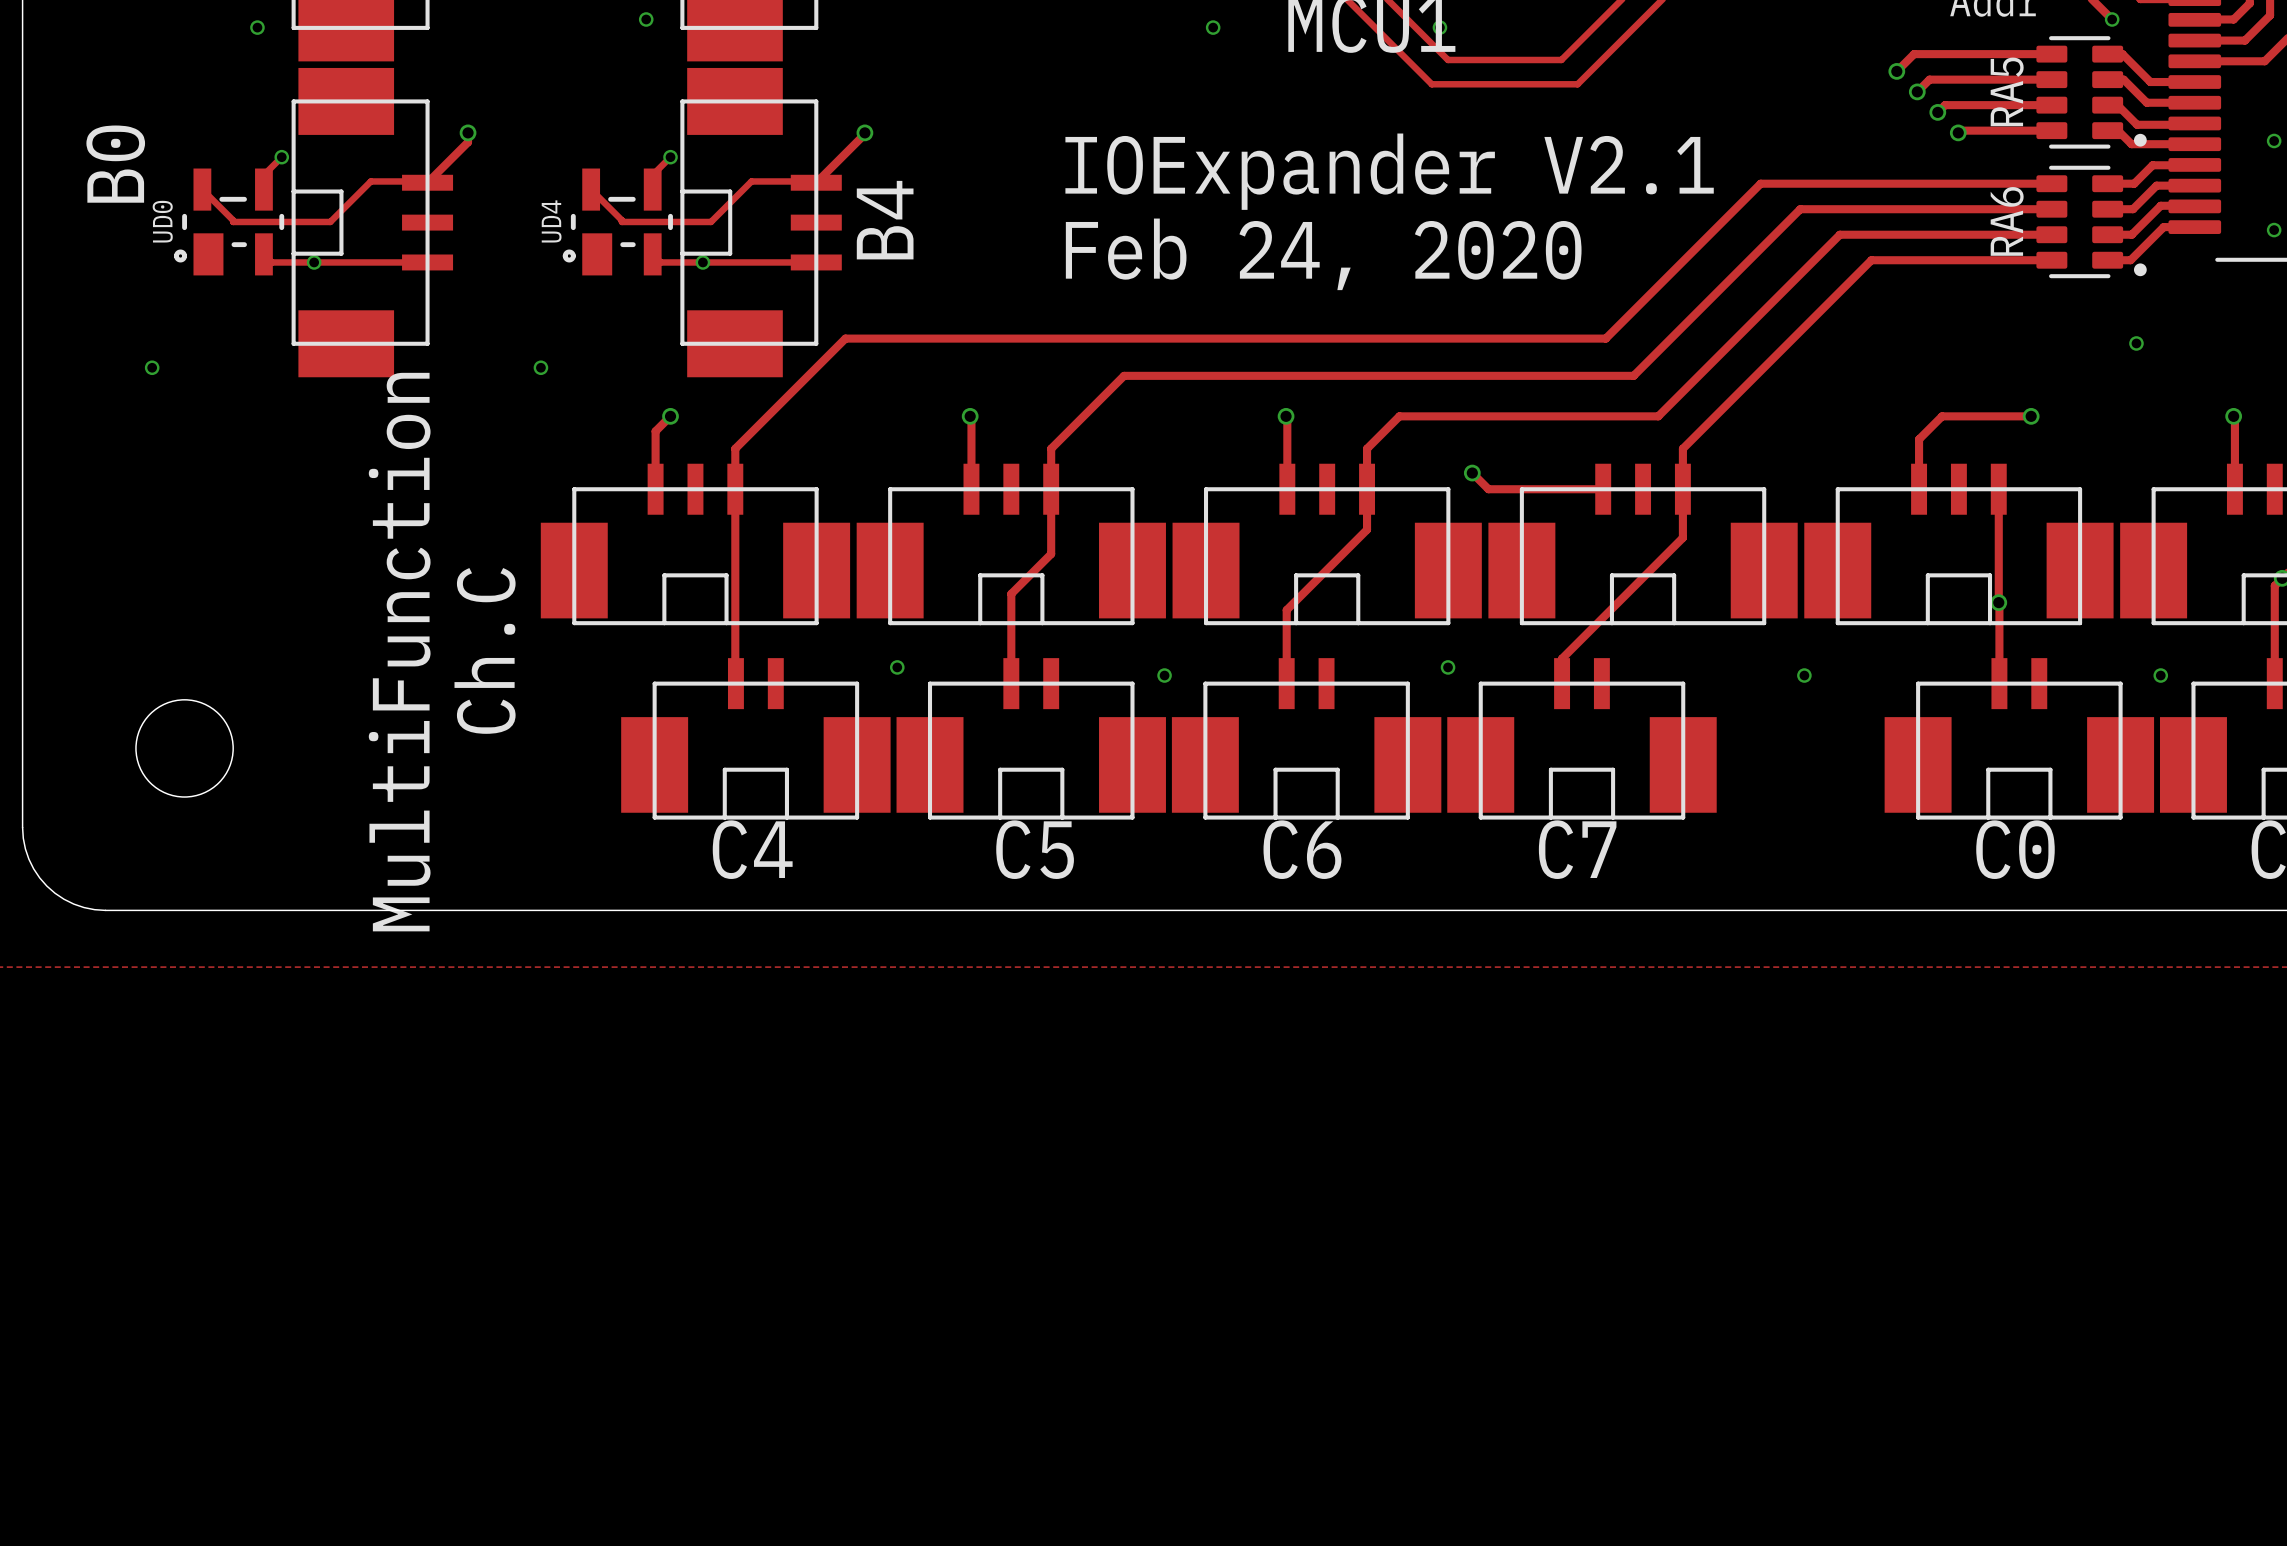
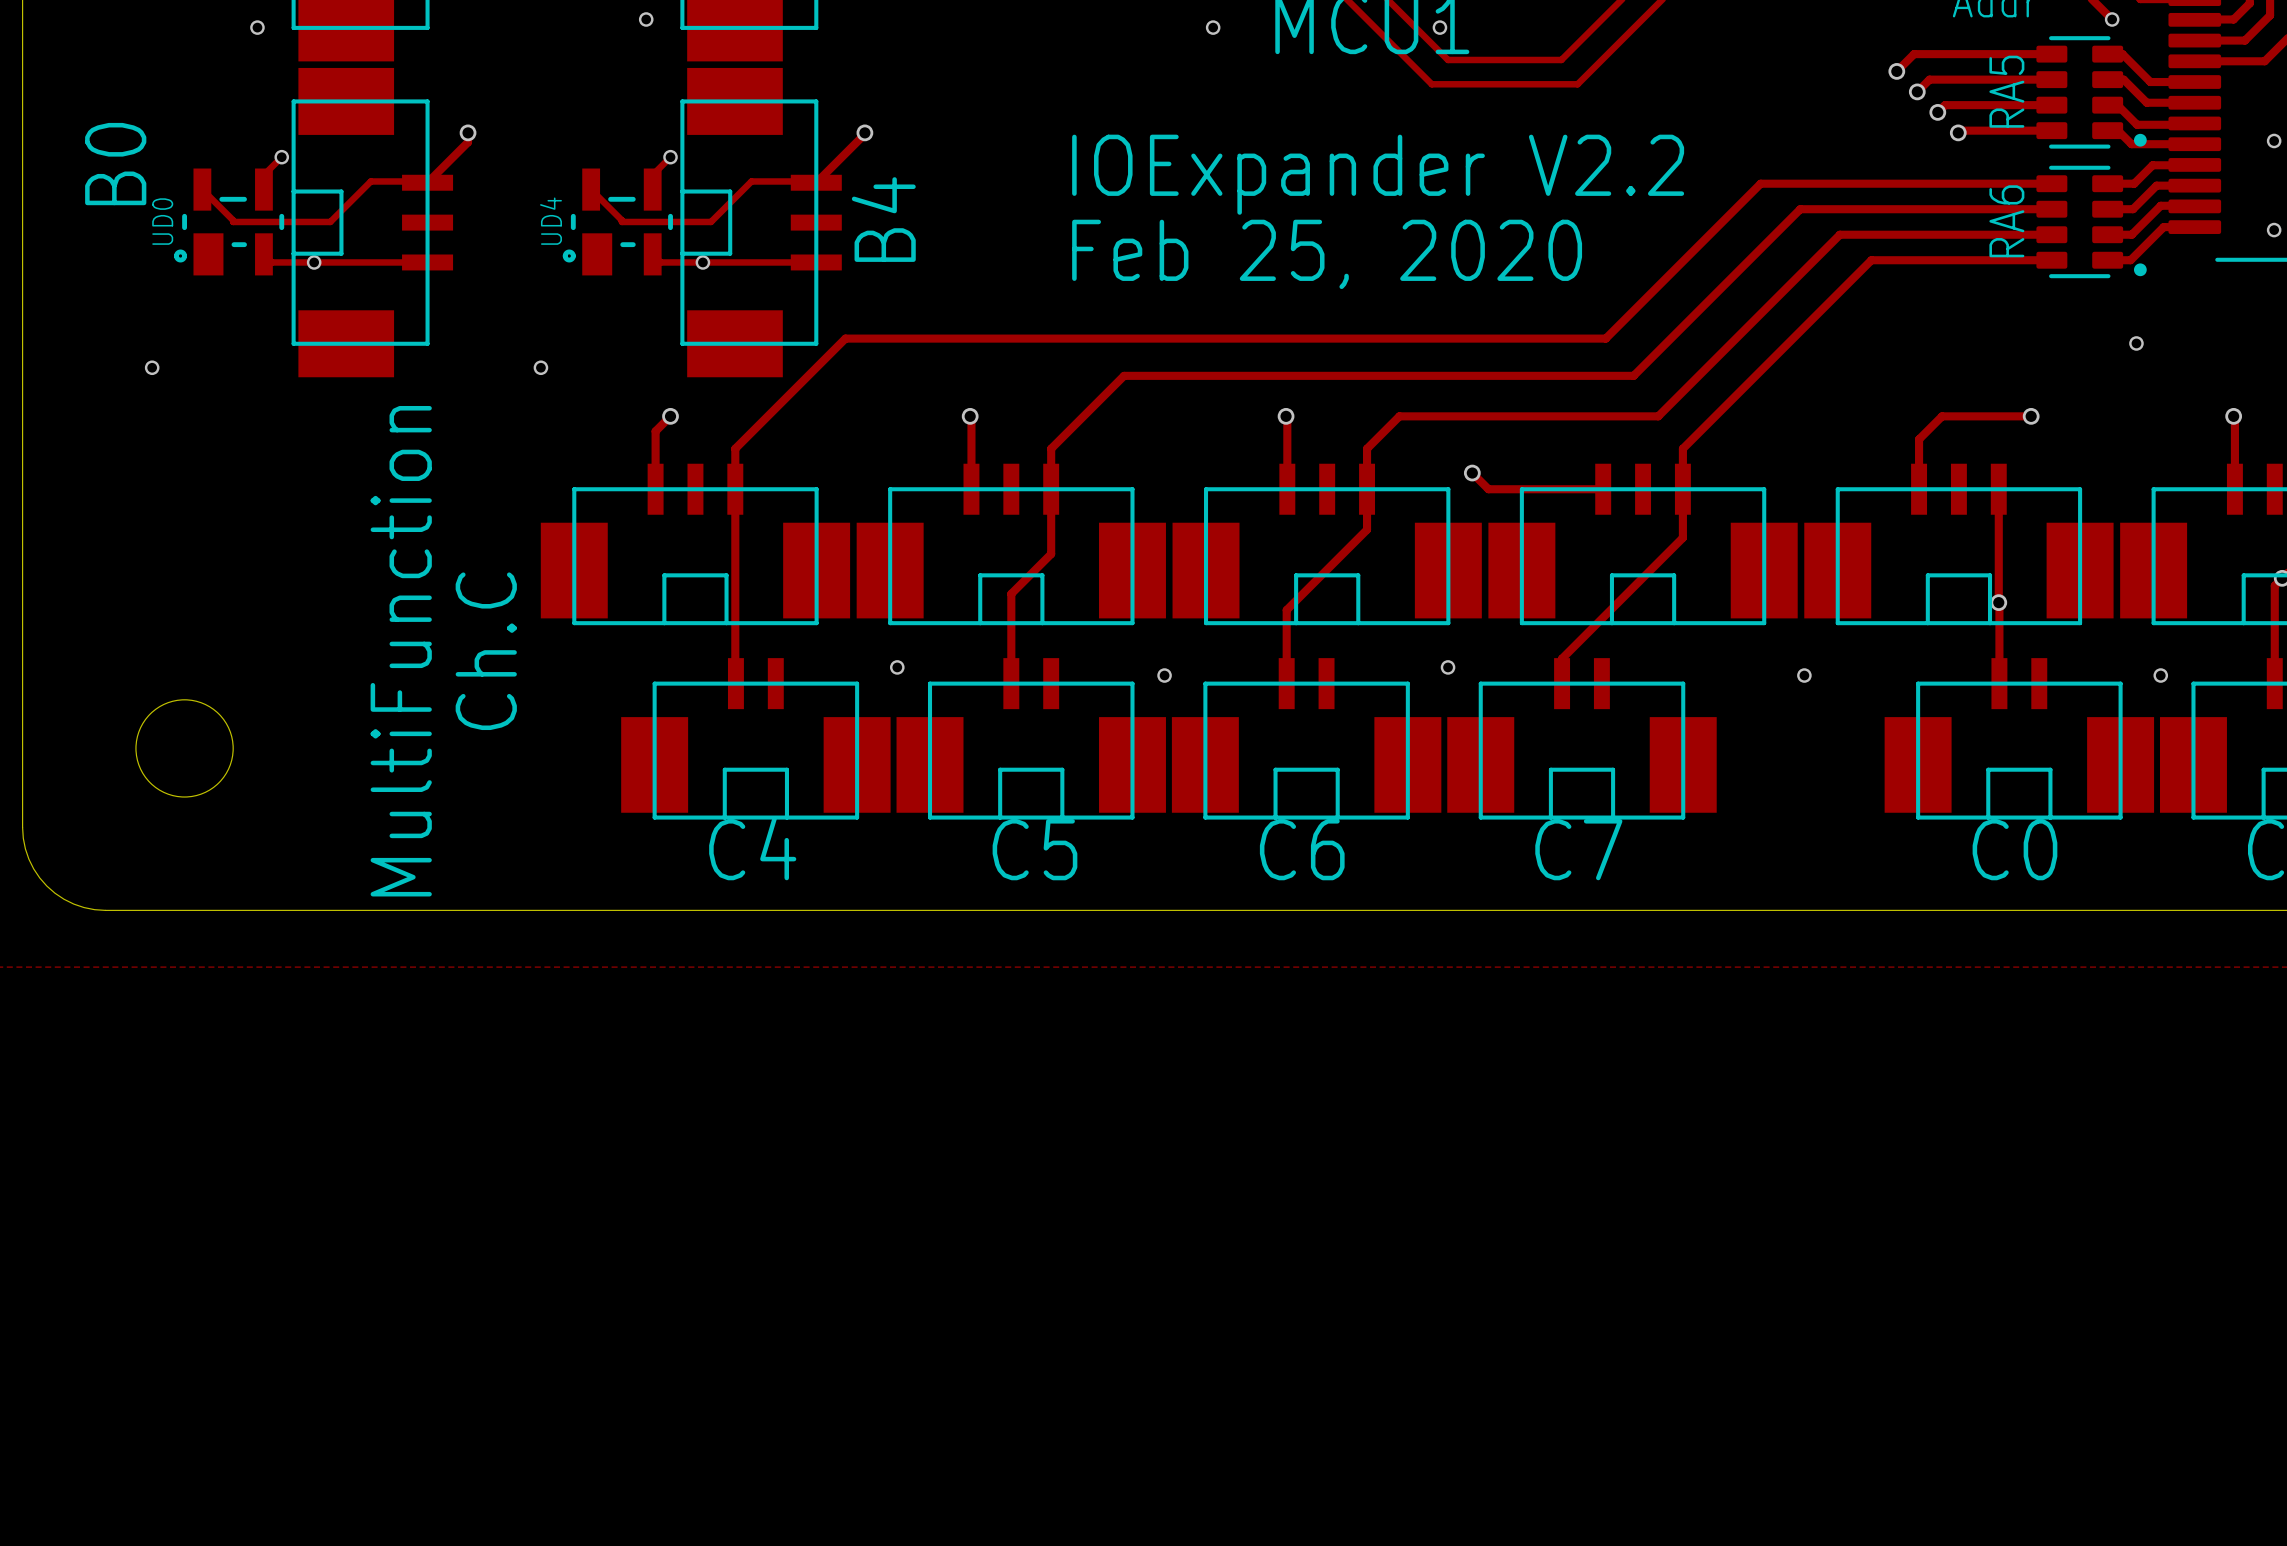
text: IOExpander V2.1 (1389, 171) -> IOExpander V2.2 (1378, 174)
text: Feb 24, 2020 (1323, 254) -> Feb 25, 2020 (1327, 254)

